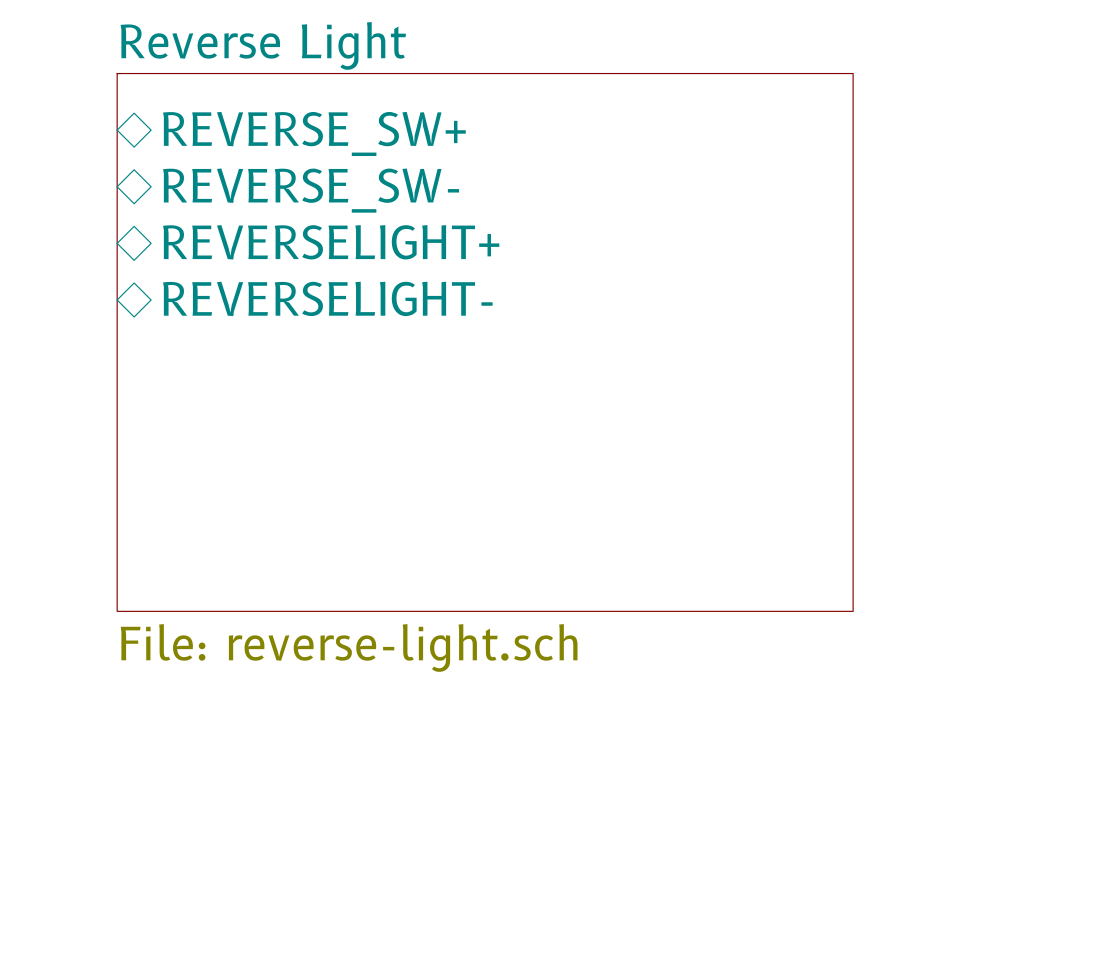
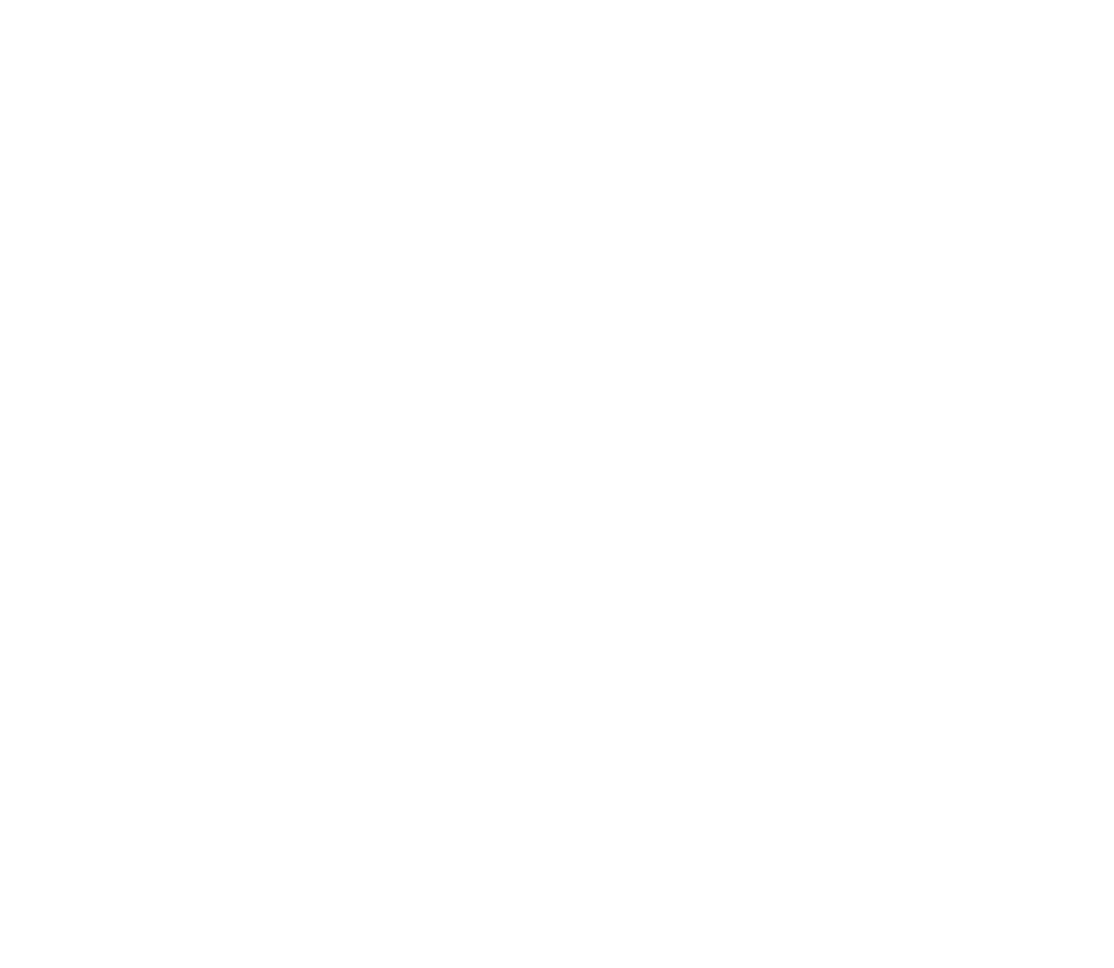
sheet pin: REVERSE_SW+ (314, 133) -> none
sheet pin: REVERSE_SW- (311, 190) -> none
sheet pin: REVERSELIGHT+ (331, 242) -> none
sheet pin: REVERSELIGHT- (327, 298) -> none
sheet Reverse Light: File: reverse-light.sch (485, 342) -> none

